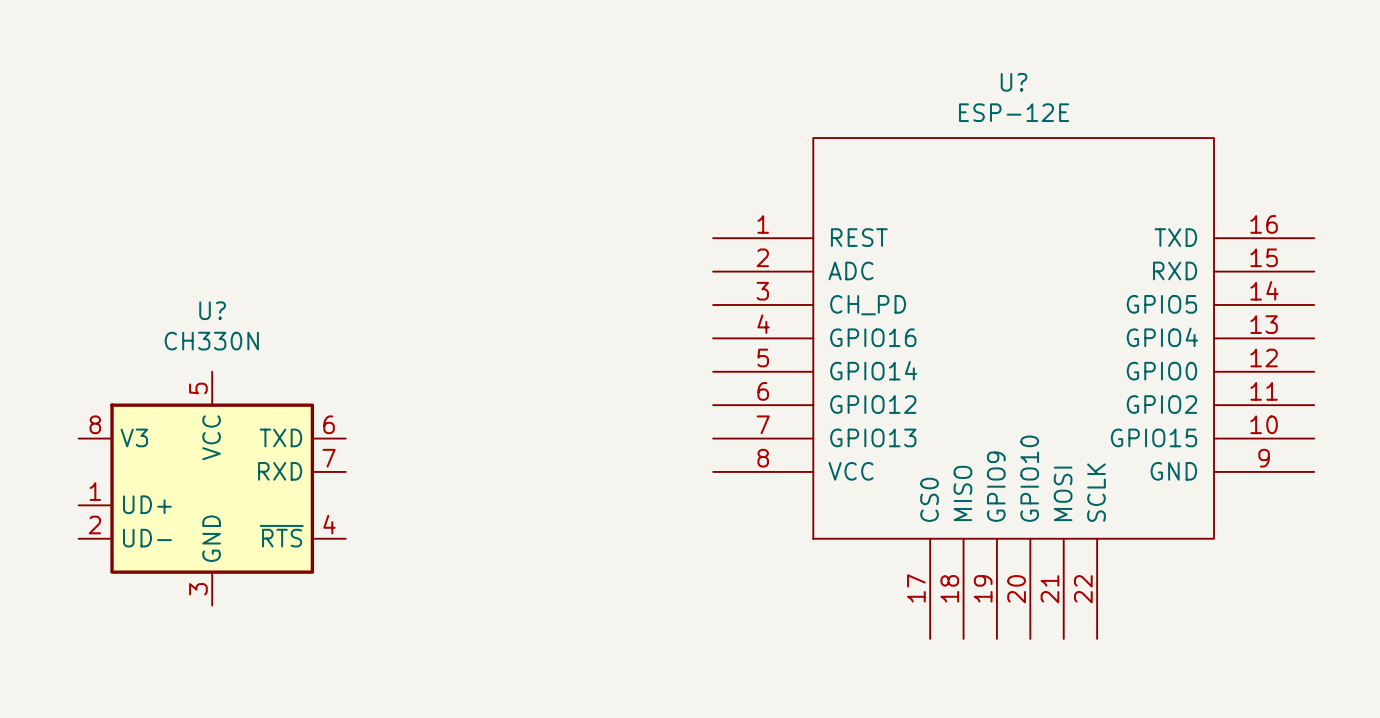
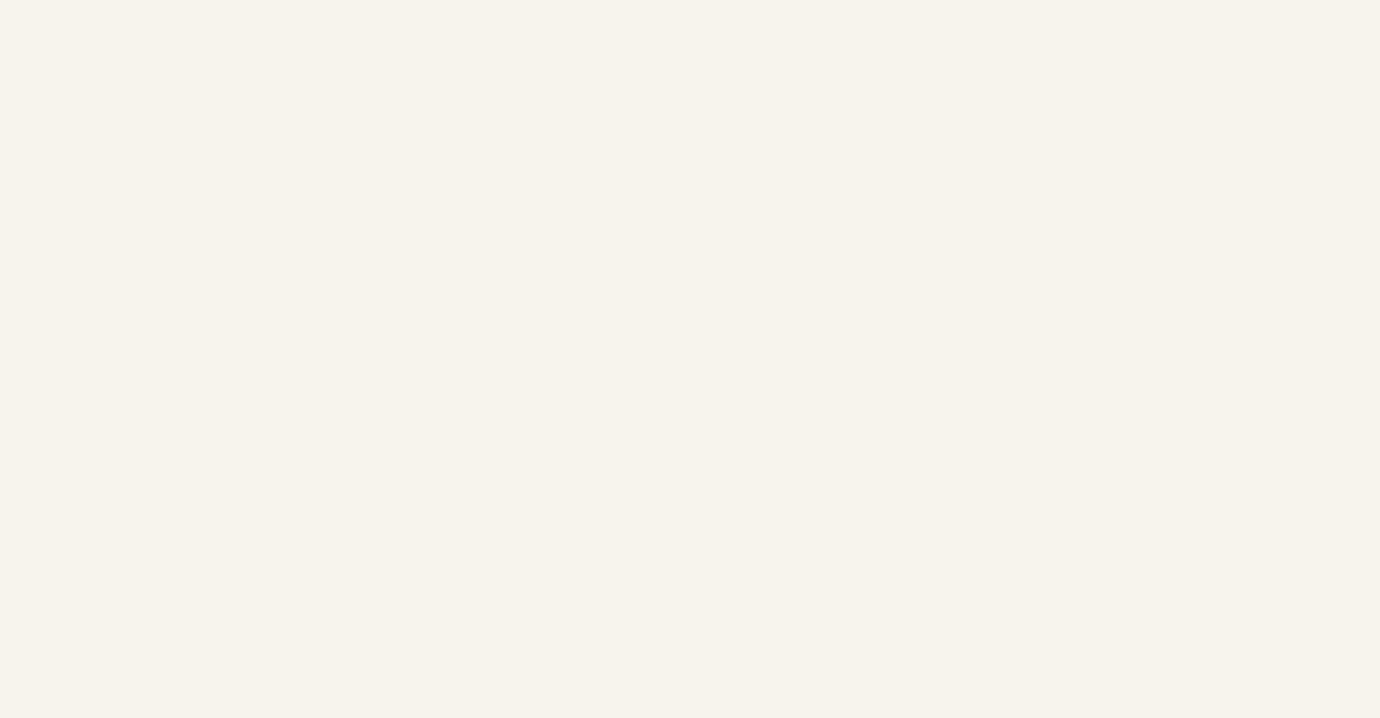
U?: ESP-12E (1013, 388) -> none
U?: CH330N (212, 488) -> none

